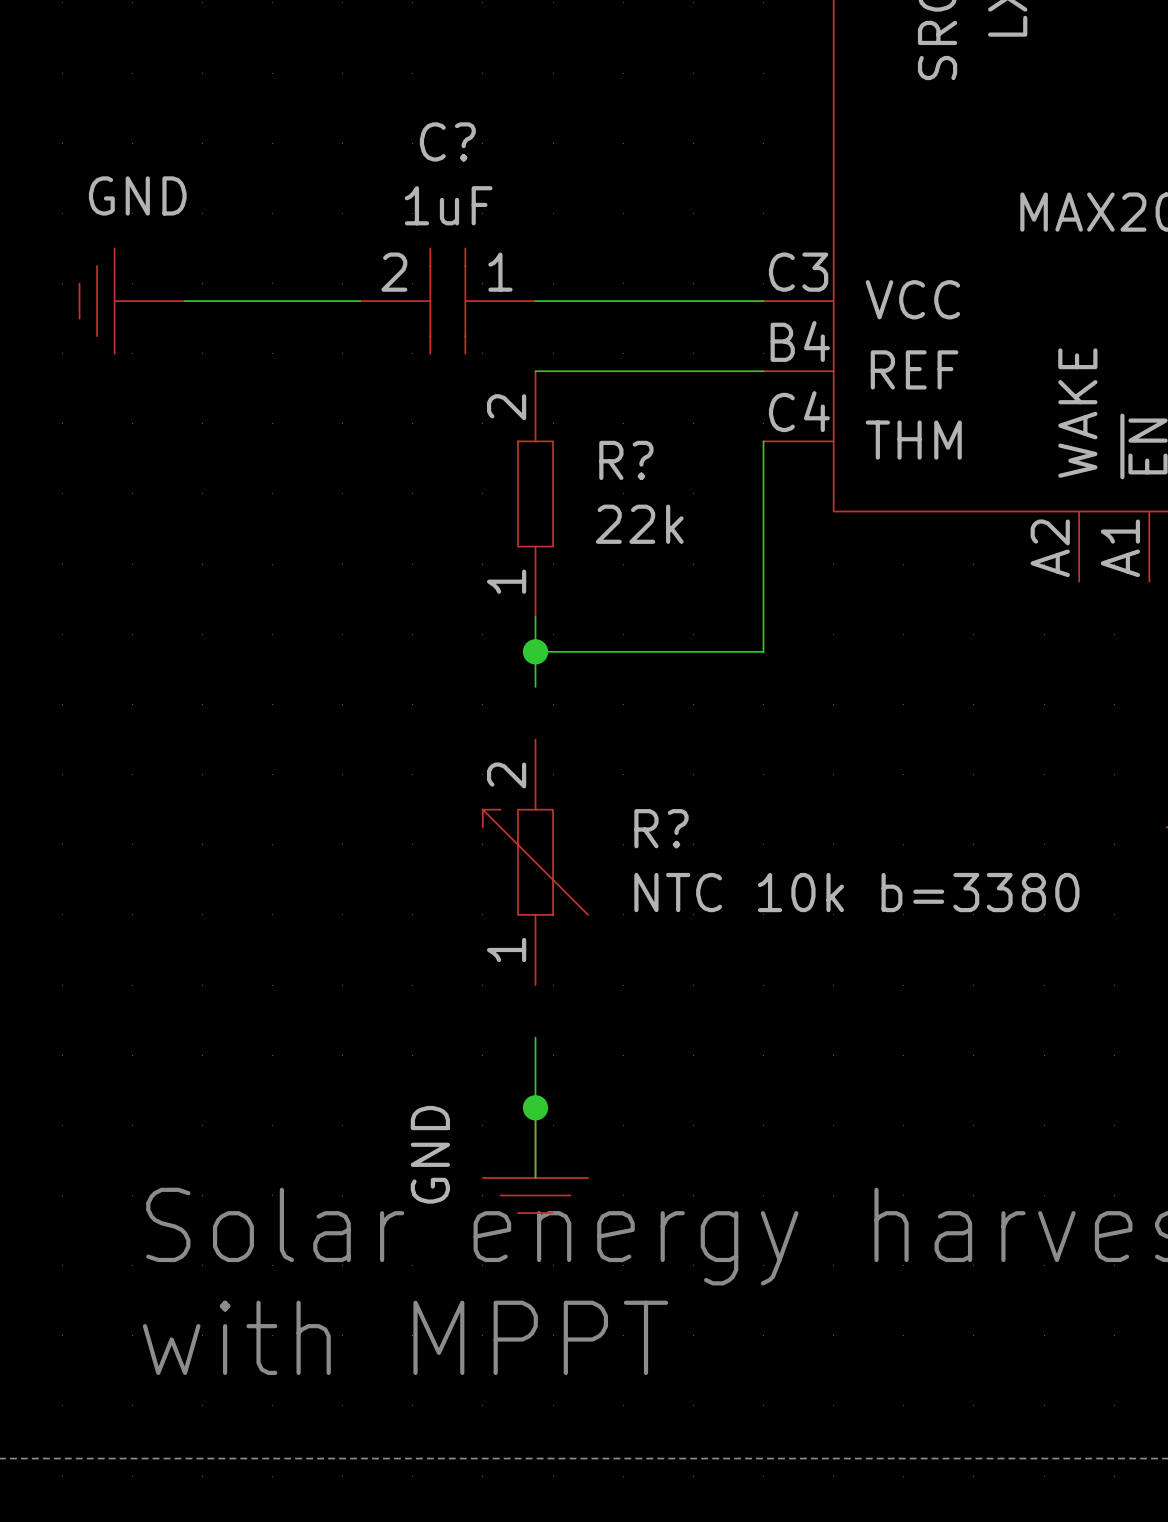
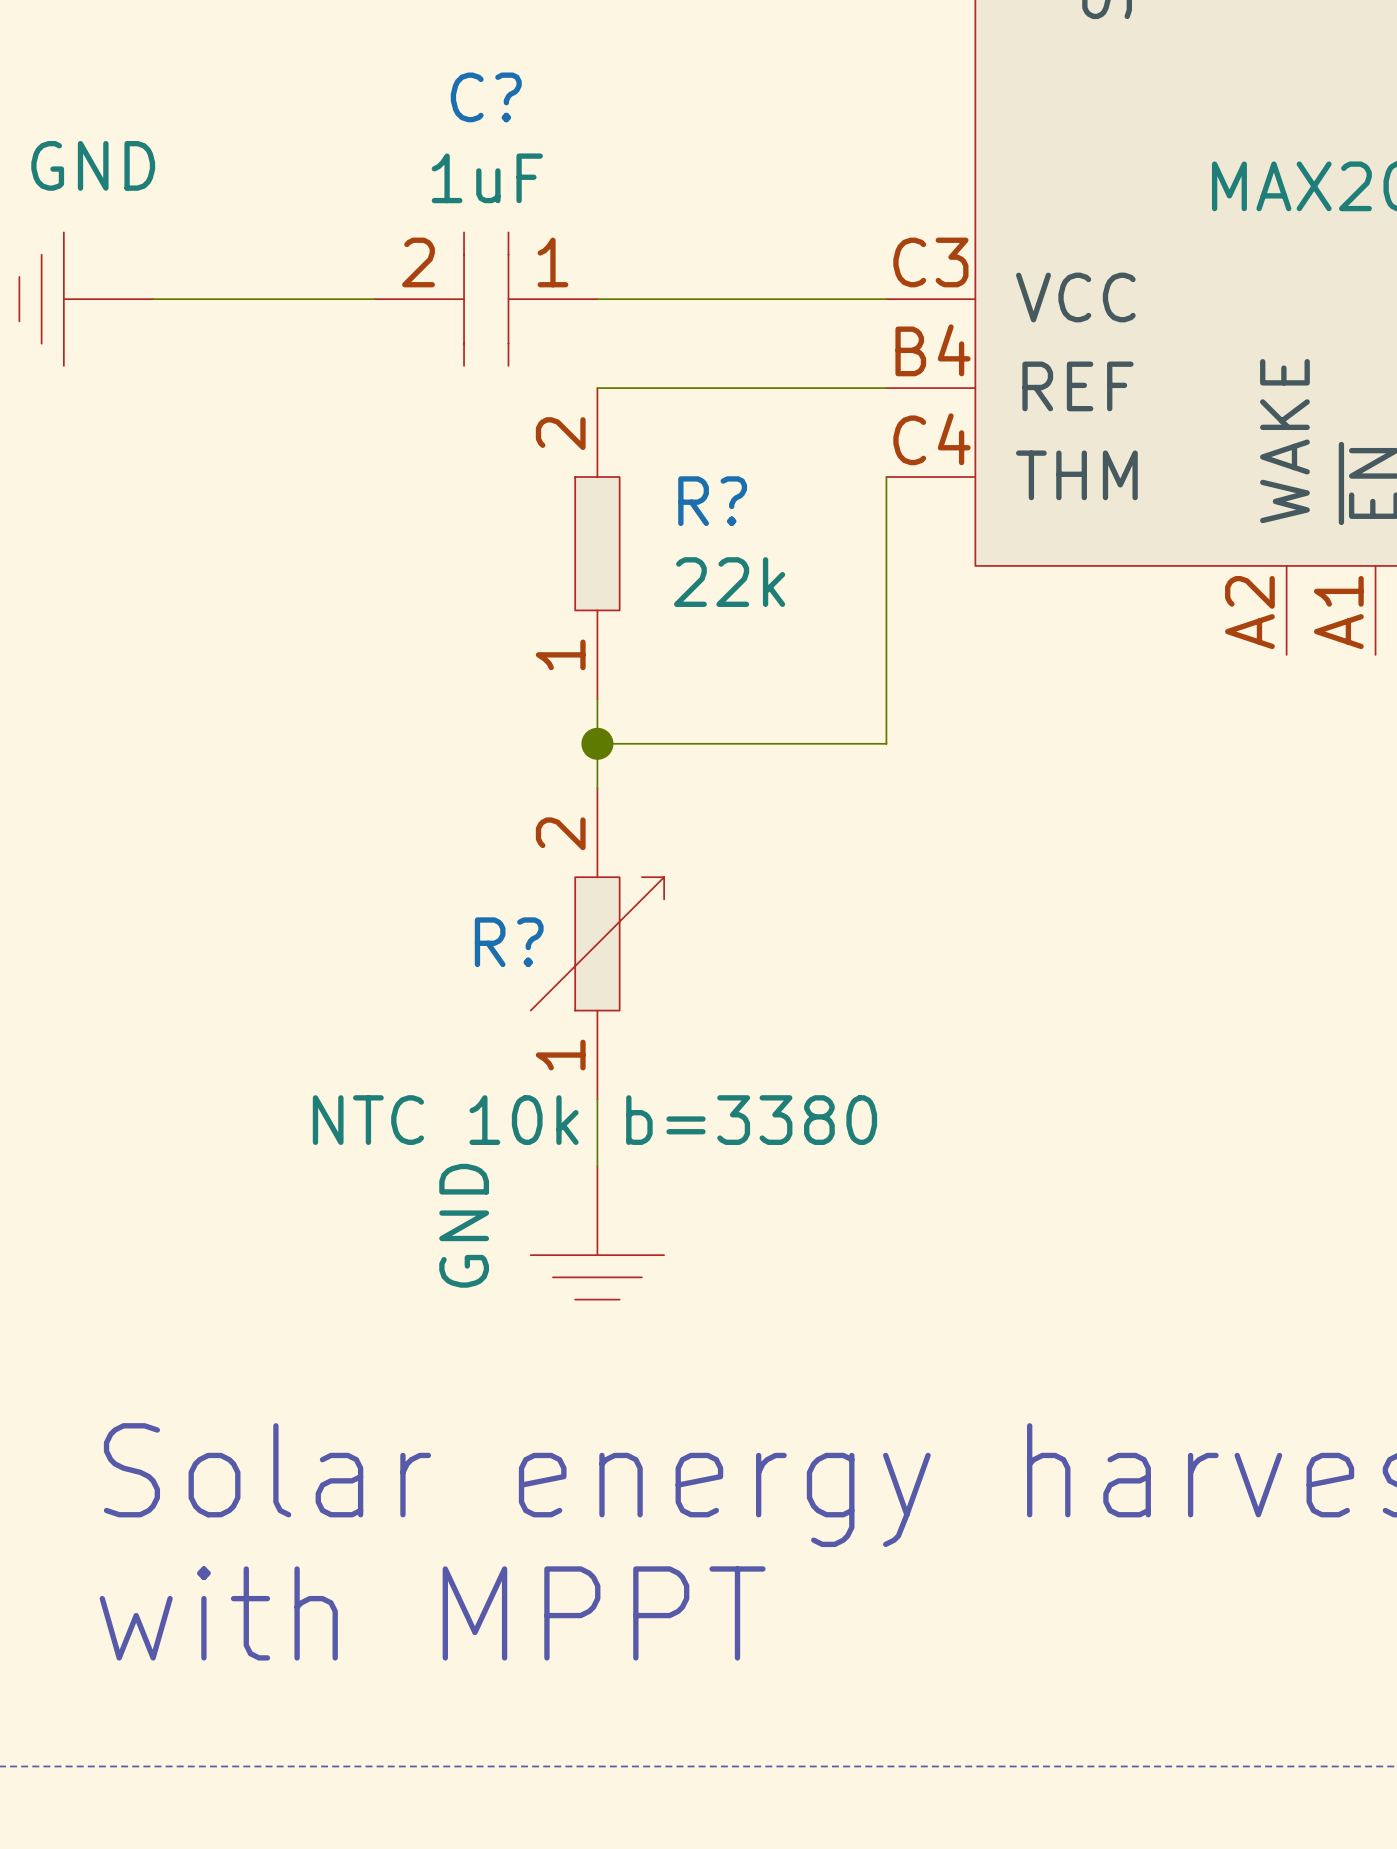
R?: none -> NTC 10k b=3380 (597, 943)
R?: NTC 10k b=3380 (535, 862) -> none
wire: (535, 1037) (535, 1177) -> none
junction: (535, 1107) -> none
part position: (535, 1160) -> (597, 1232)

